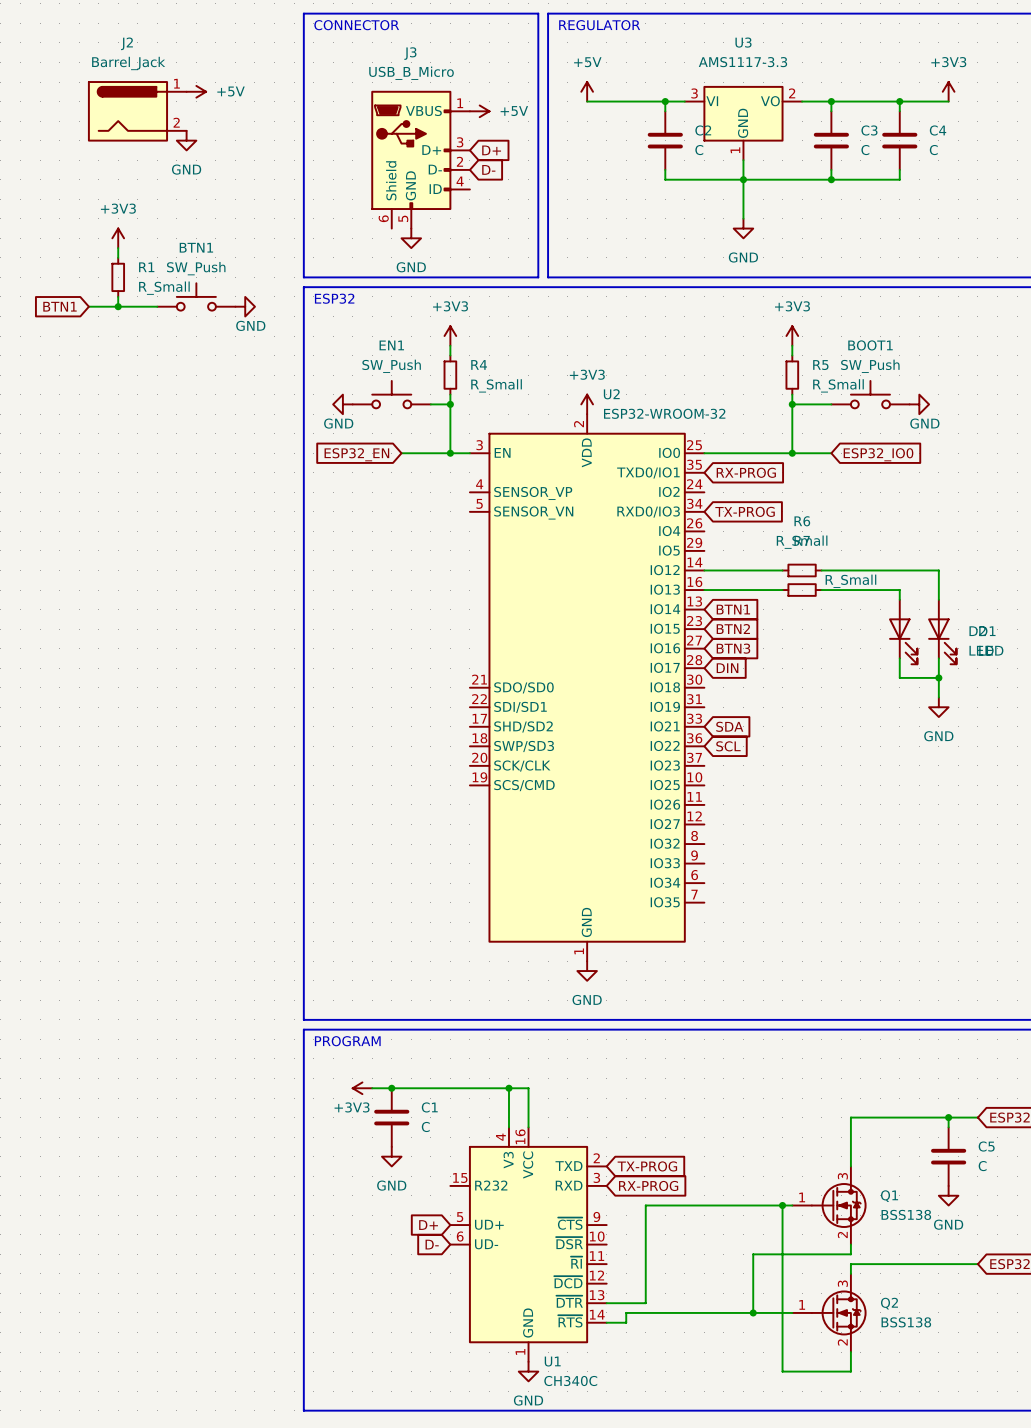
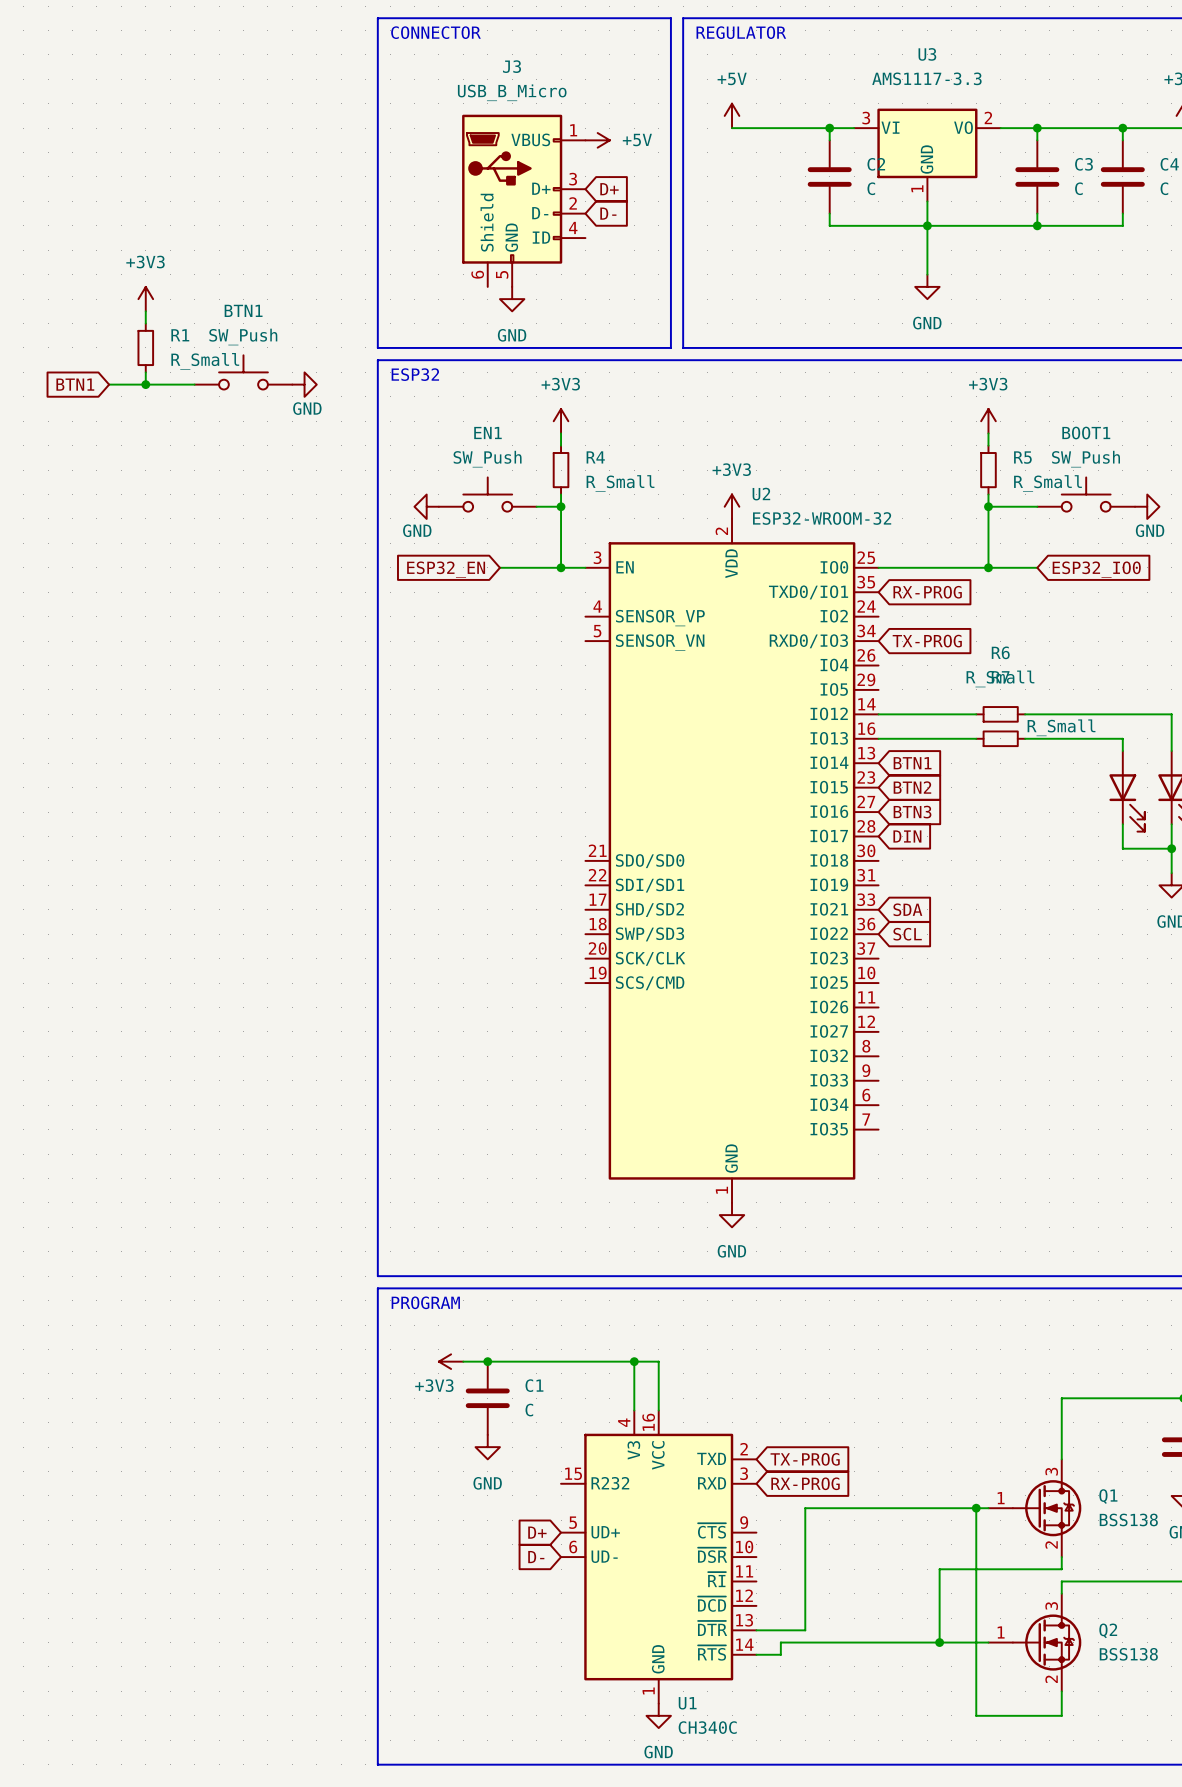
power symbol: +5V (196, 91) -> none
J2: Barrel_Jack (137, 111) -> none
power symbol: GND (186, 140) -> none

